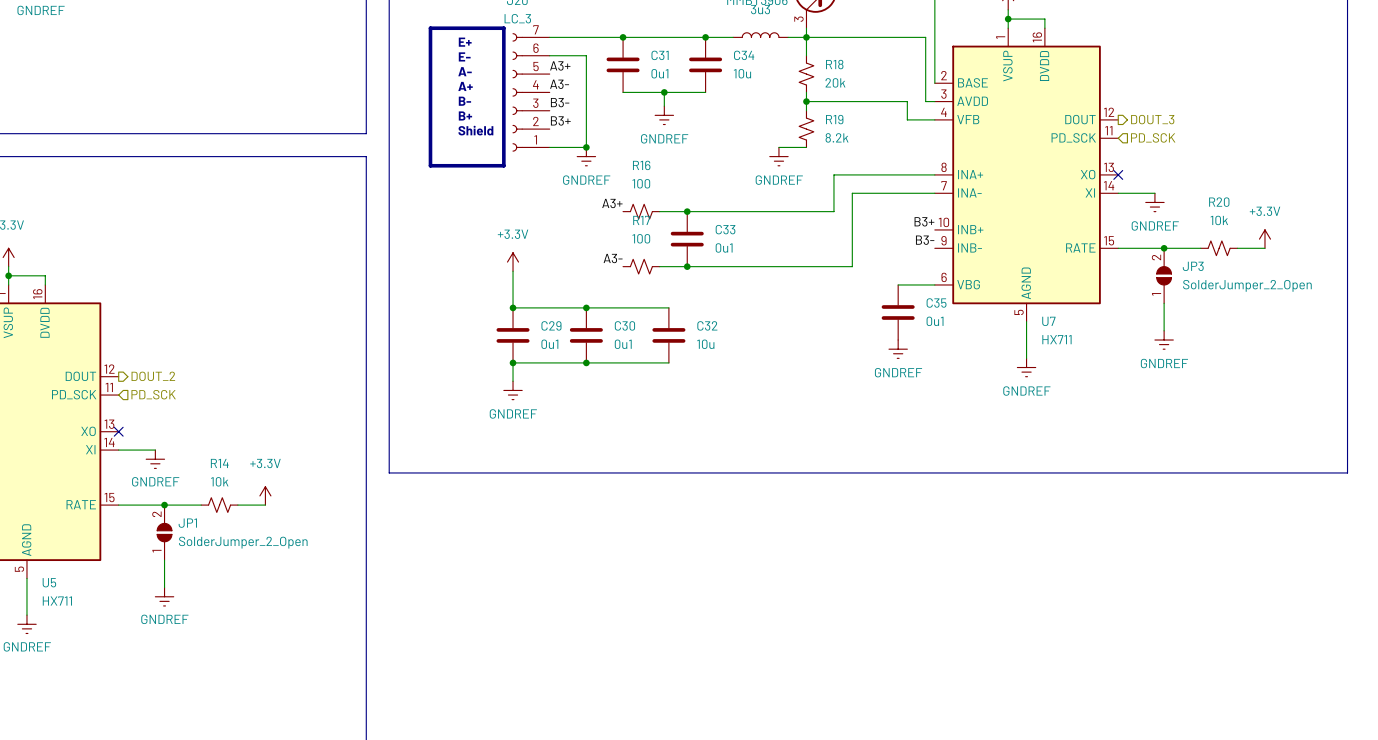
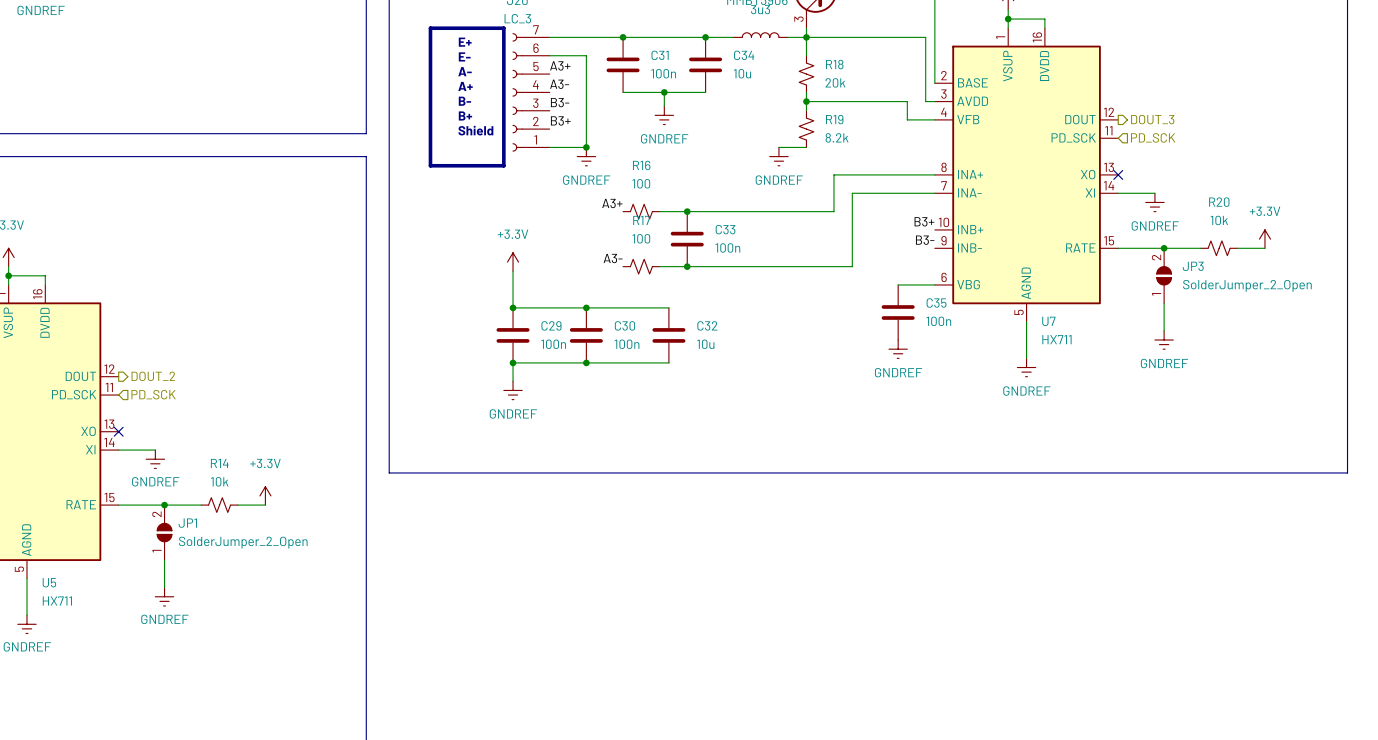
C31 value: 0u1 (659, 73) -> 100n (663, 73)
C33 value: 0u1 (724, 247) -> 100n (727, 247)
C35 value: 0u1 (935, 321) -> 100n (938, 321)
C29 value: 0u1 (549, 344) -> 100n (553, 344)
C30 value: 0u1 (623, 344) -> 100n (627, 344)

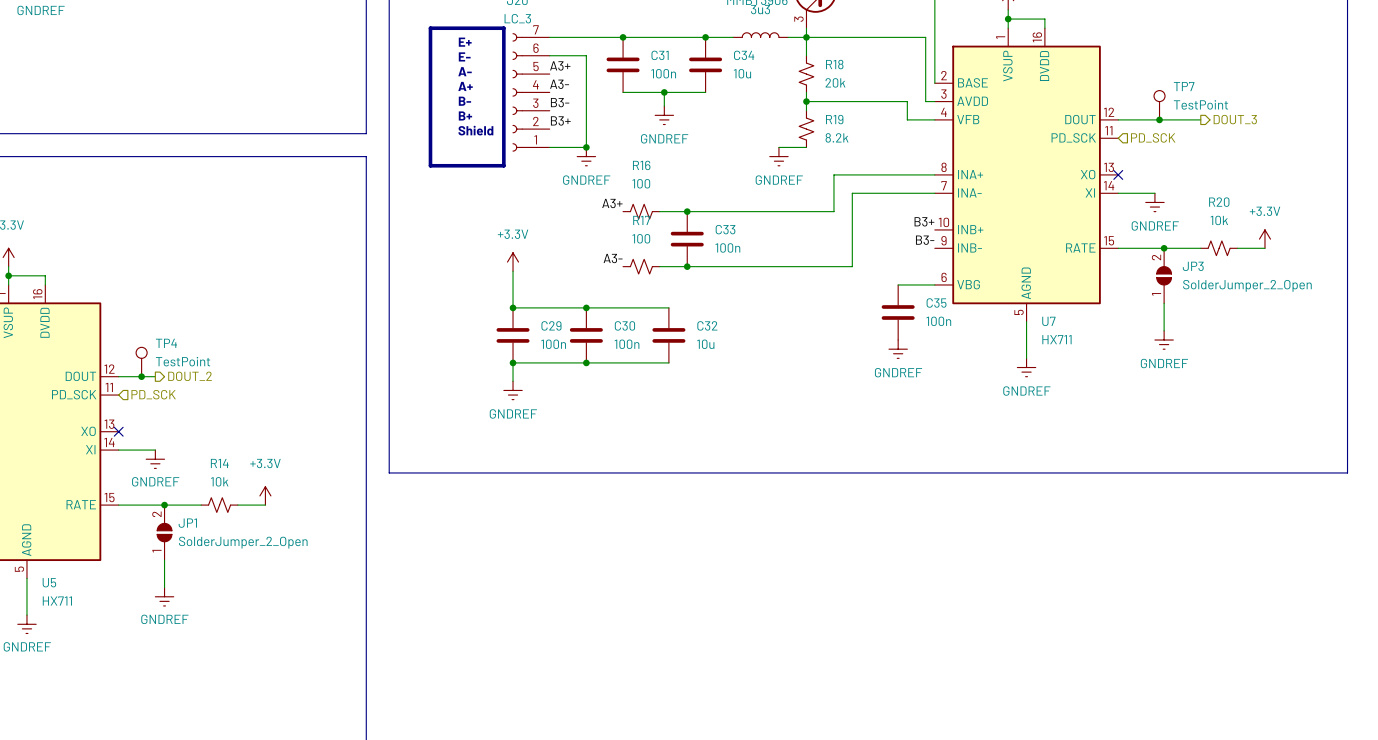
TP7: none -> TestPoint (1159, 105)
wire: none -> (1118, 119) (1200, 119)
hierarchical label position: DOUT_3 (1152, 119) -> DOUT_3 (1235, 119)
junction: none -> (1159, 119)
TP4: none -> TestPoint (141, 362)
wire: none -> (118, 376) (155, 376)
junction: none -> (141, 376)
hierarchical label position: DOUT_2 (153, 376) -> DOUT_2 (190, 376)

